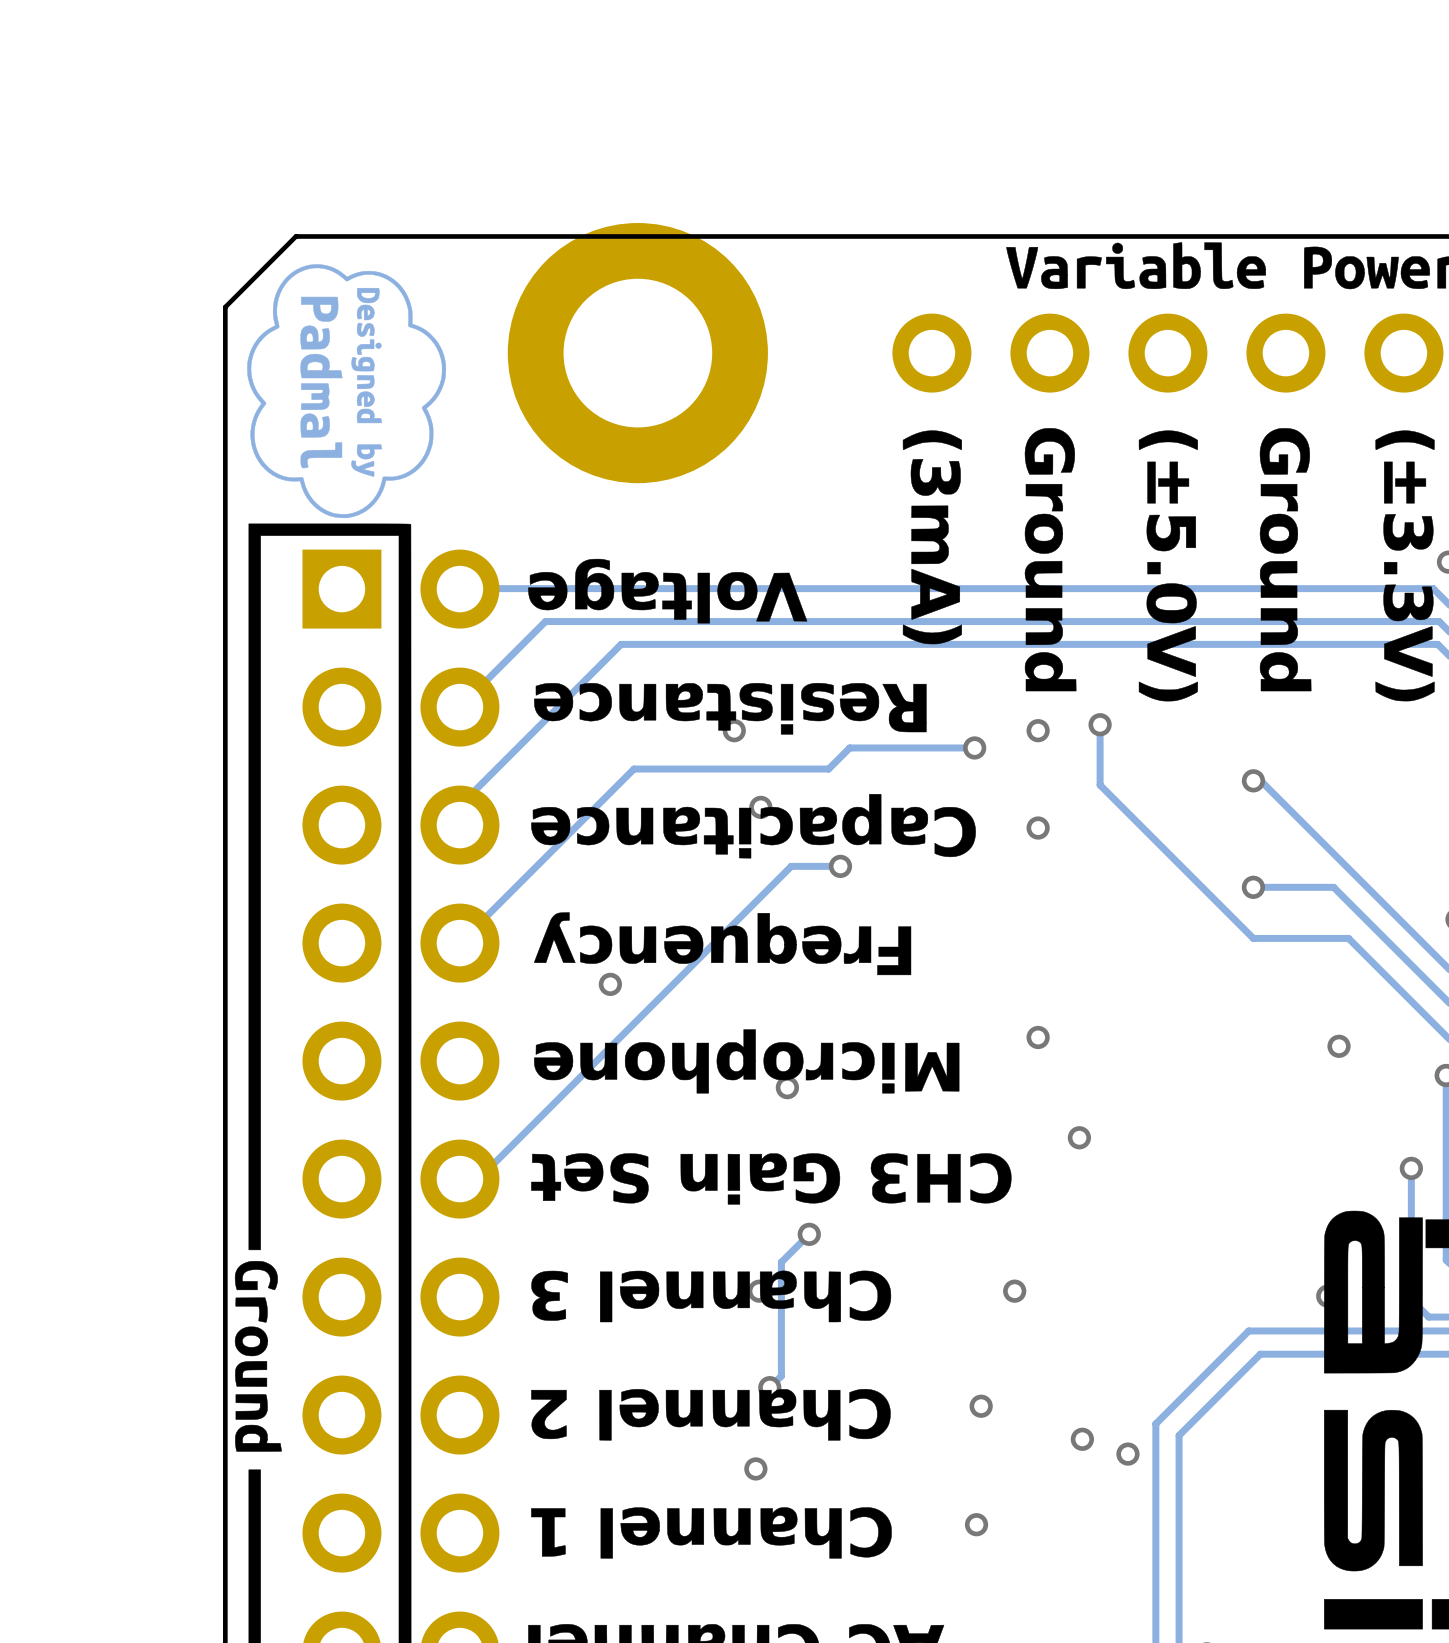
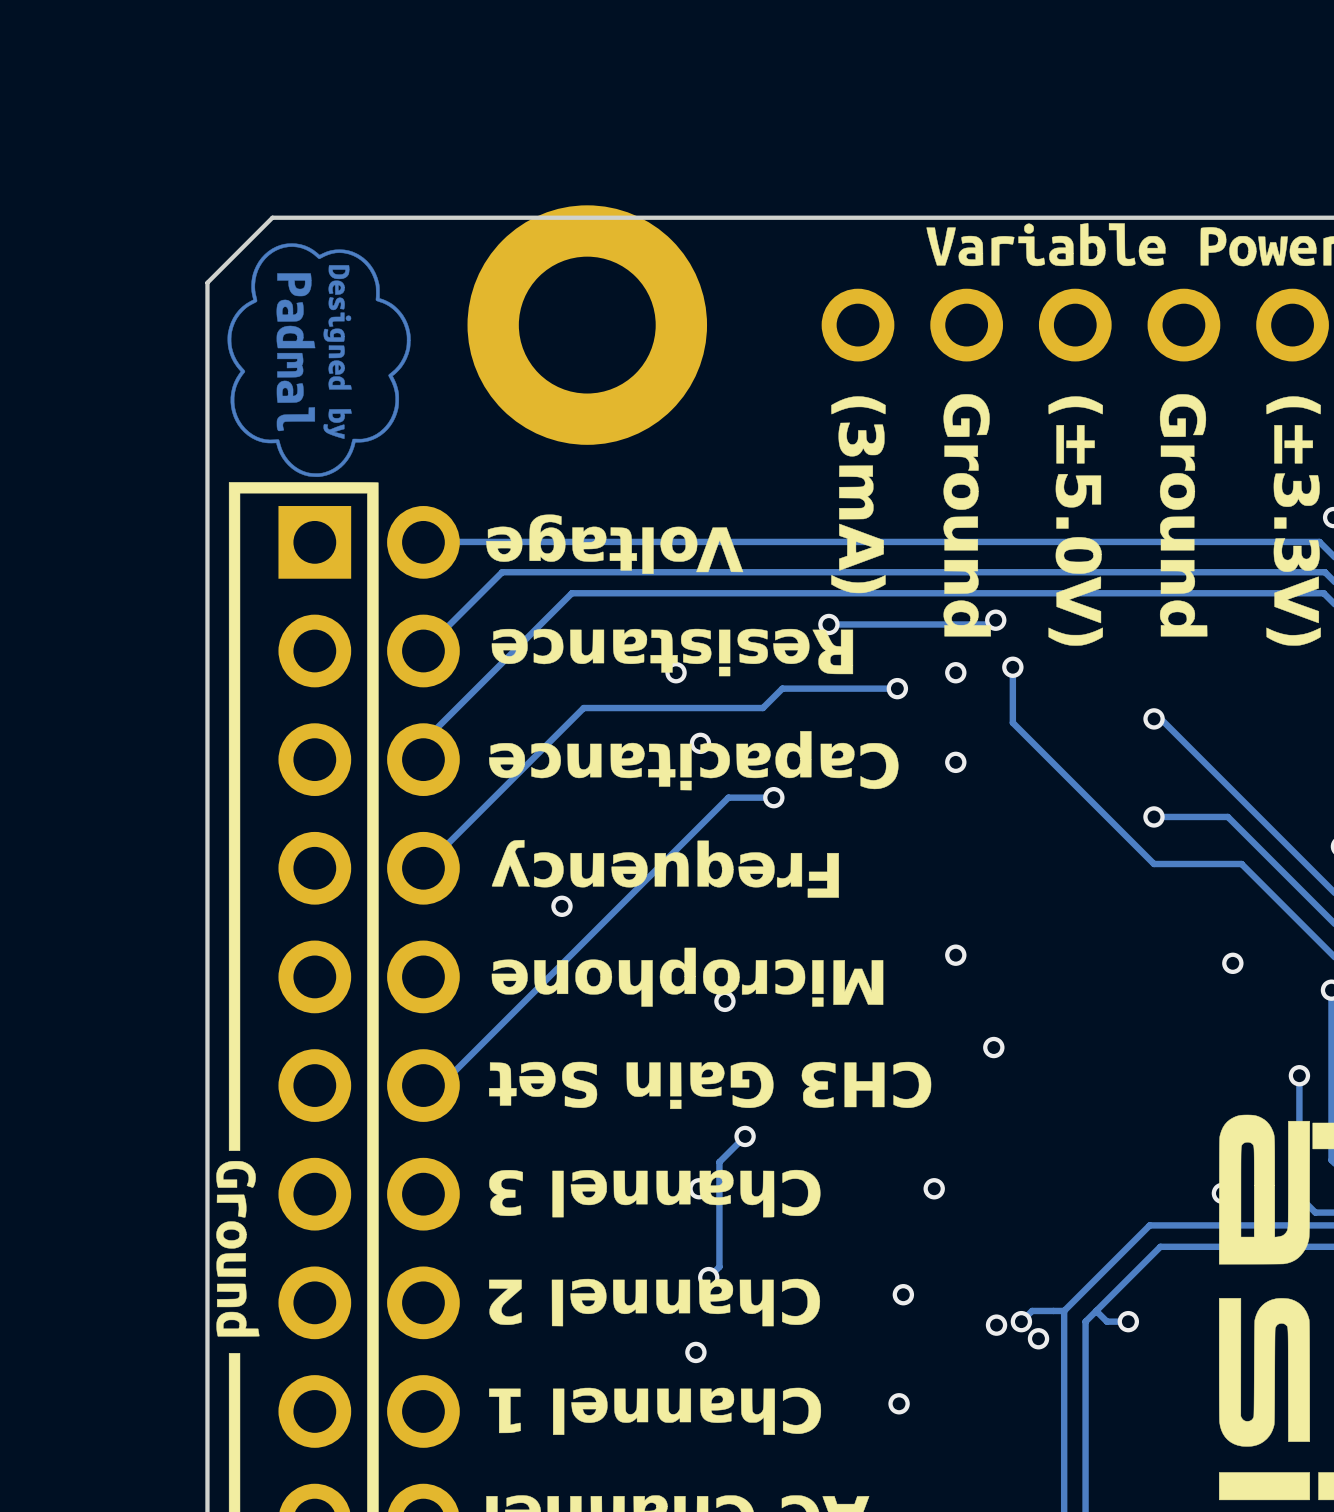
track: none -> (995, 620) (991, 624) (828, 624)
via: none -> (995, 620)
via: none -> (828, 624)
track: none -> (1064, 1310) (1032, 1310) (1021, 1321)
track: none -> (1096, 1310) (1106, 1321) (1128, 1321)
via: none -> (1021, 1321)
via: none -> (1128, 1321)

